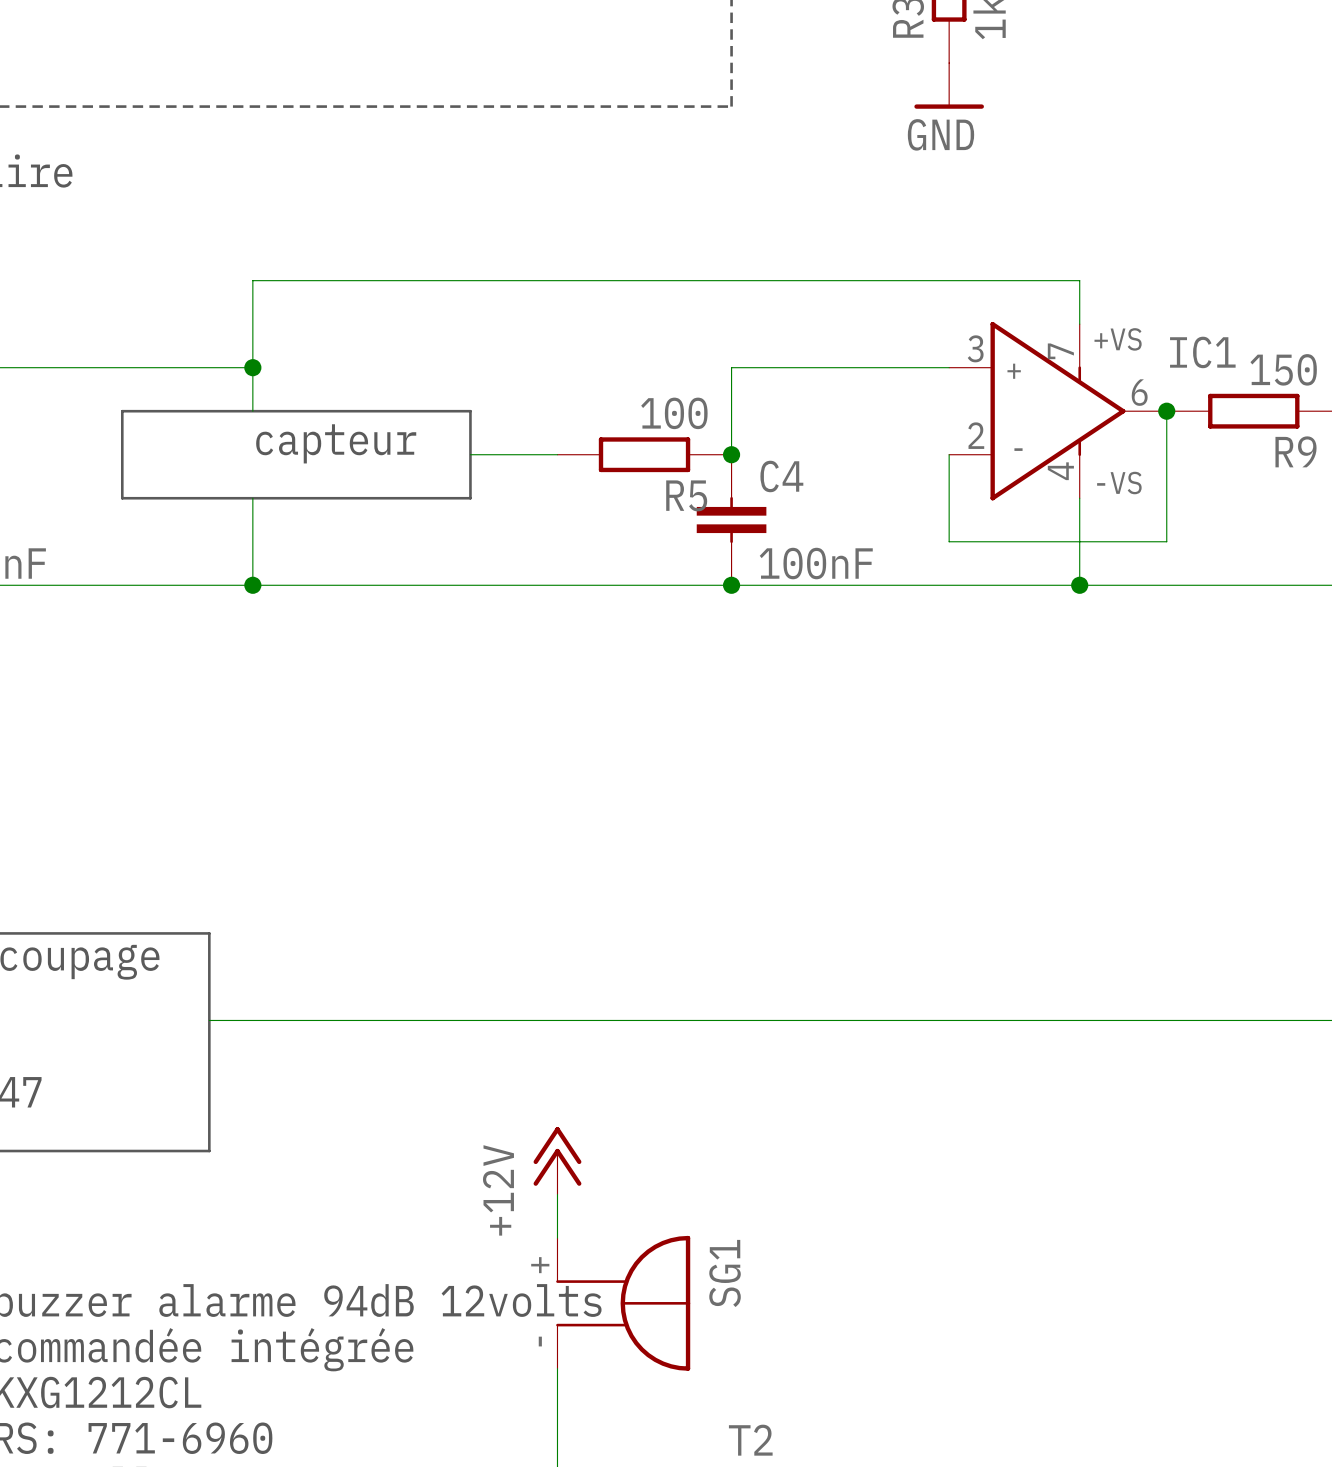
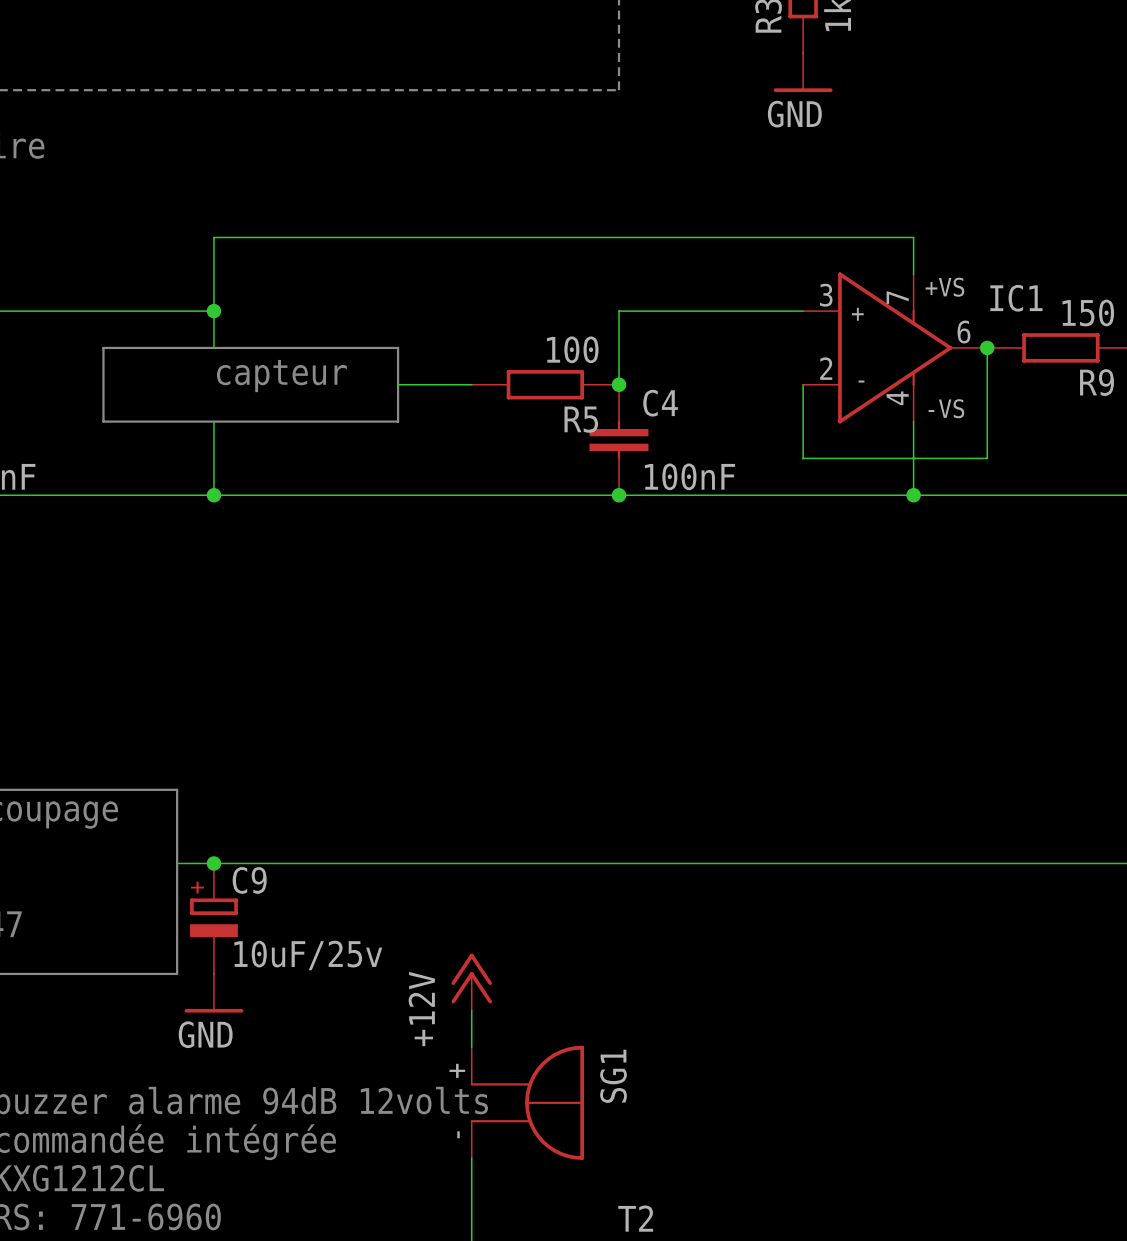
junction: none -> (213, 863)
C9: none -> 10uF/25v (213, 918)
power symbol: none -> GND (213, 993)

